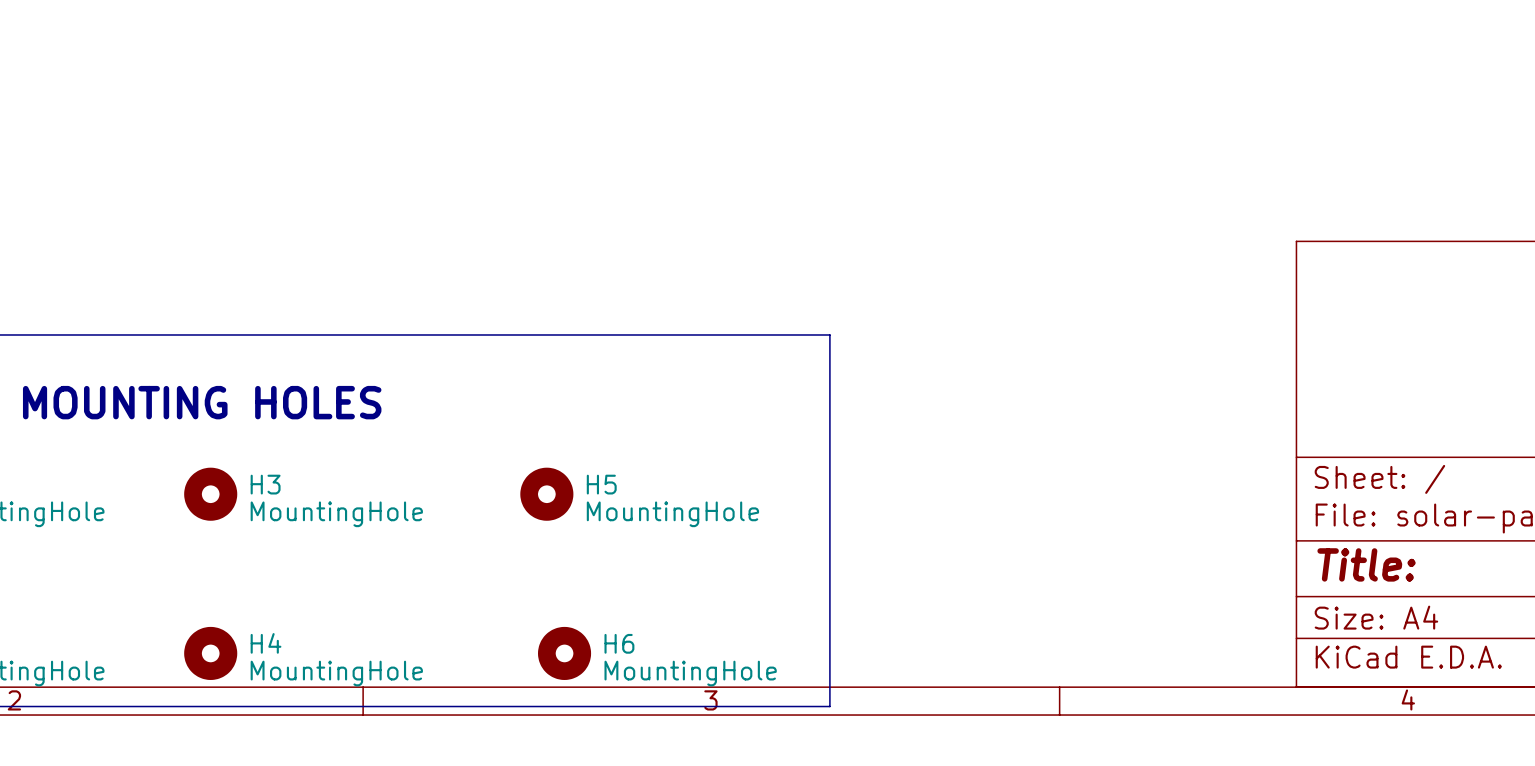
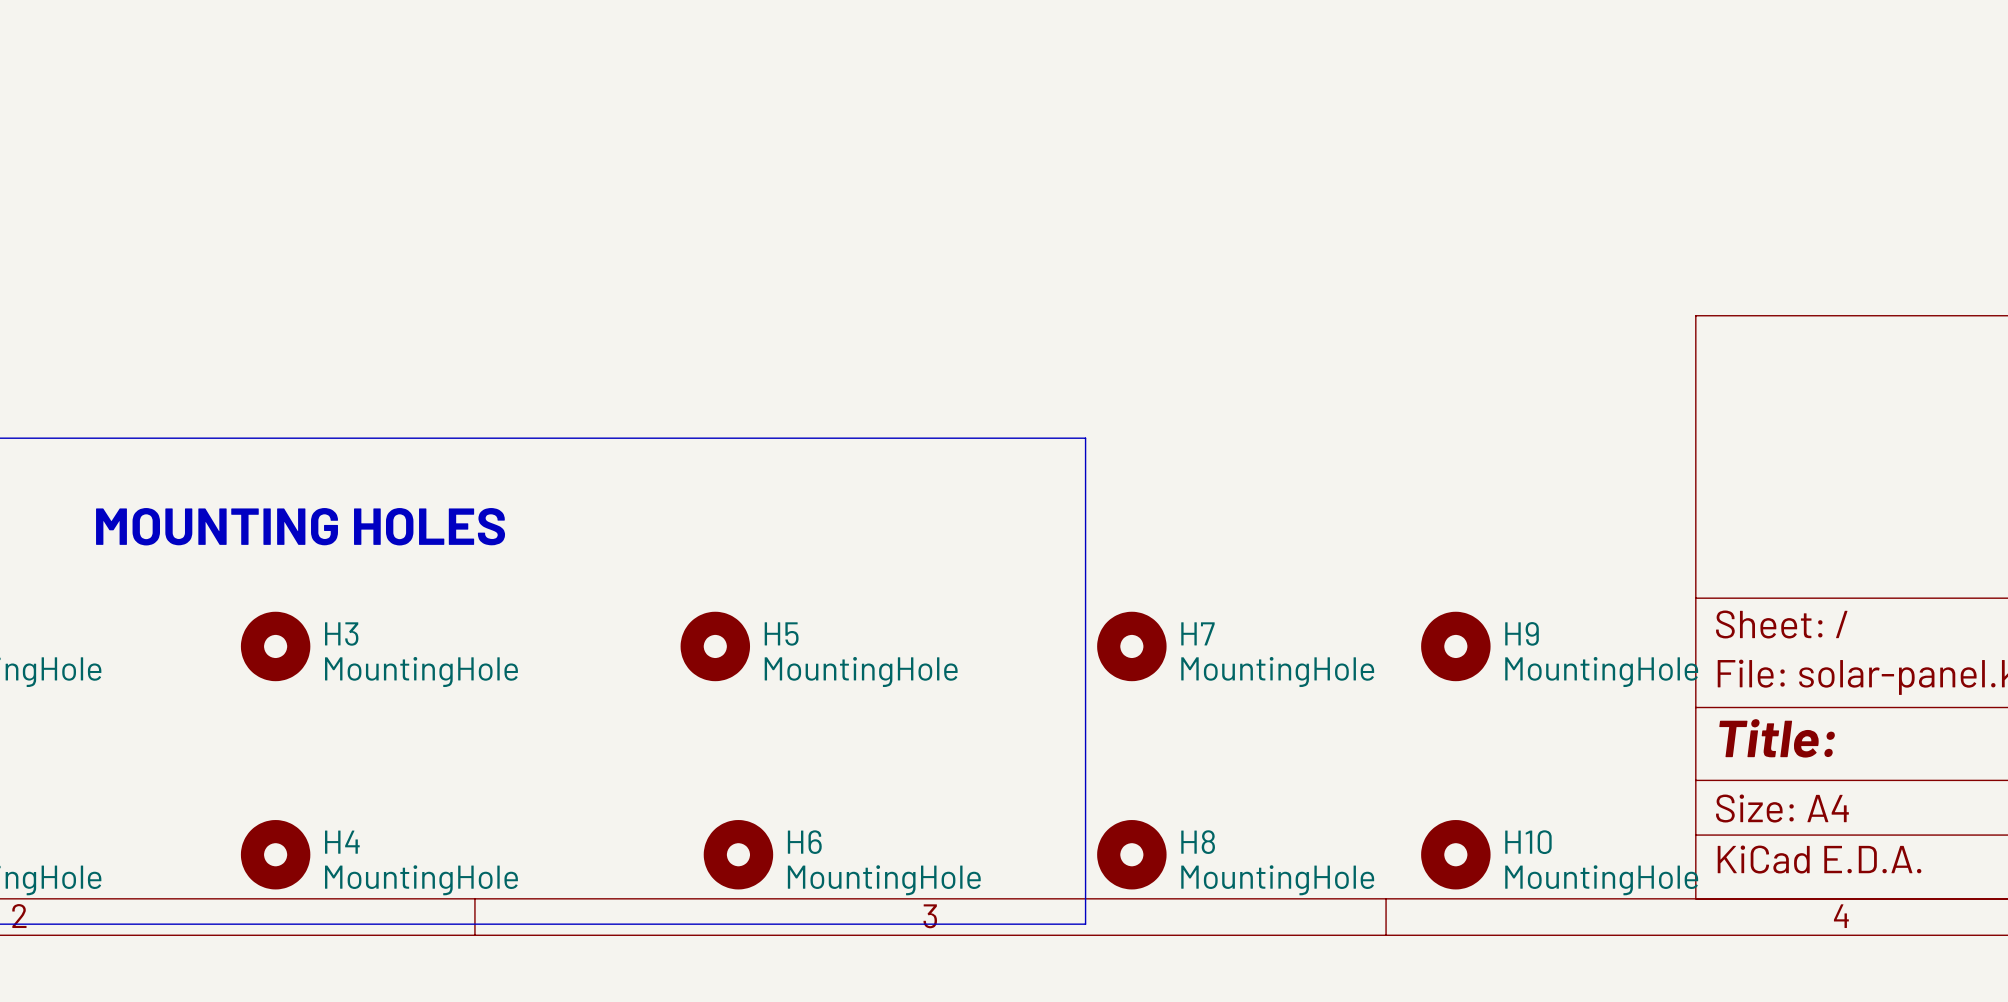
H7: none -> MountingHole (1131, 646)
H9: none -> MountingHole (1455, 646)
H8: none -> MountingHole (1131, 854)
H10: none -> MountingHole (1455, 854)

